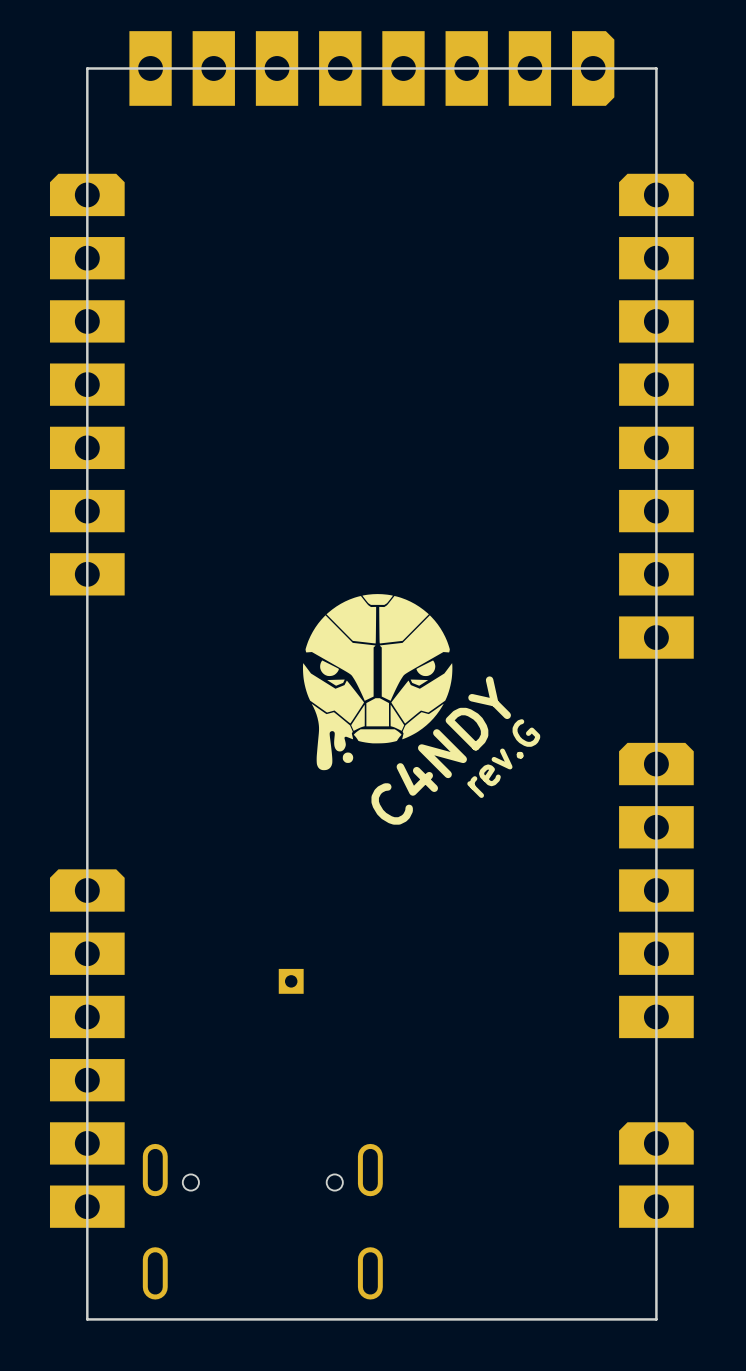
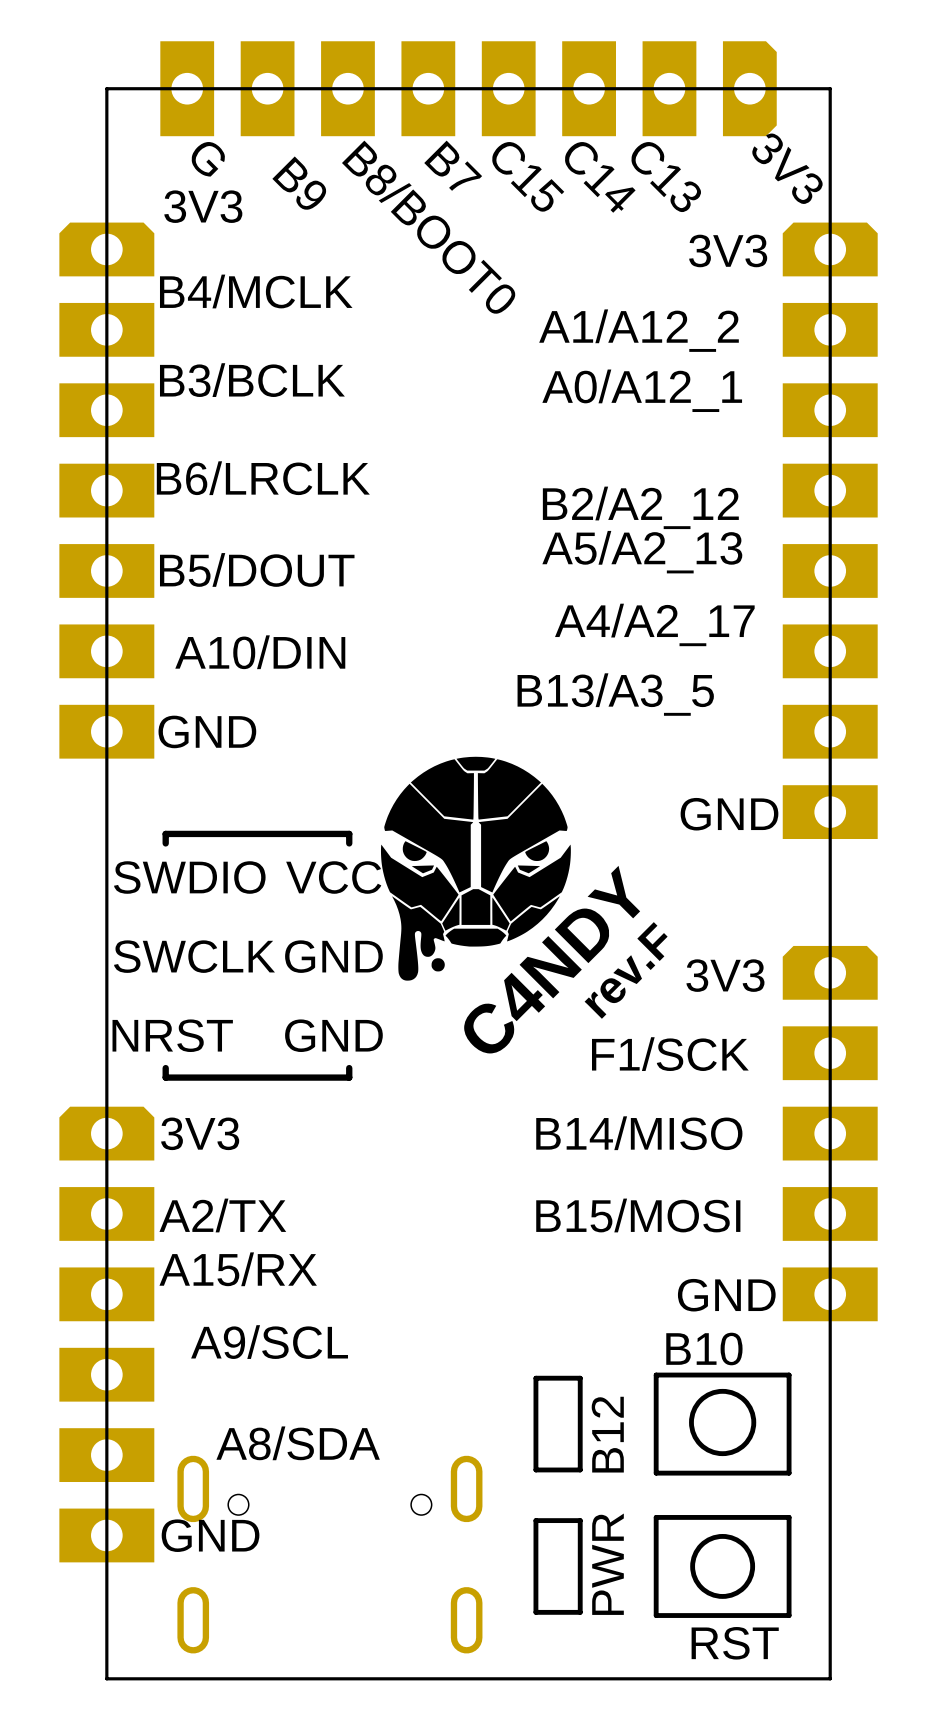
text: none -> G (208, 159)
text: none -> B7 (453, 165)
text: none -> 3V3 (787, 168)
text: none -> C15 (527, 176)
text: none -> C14 (599, 177)
text: none -> C13 (666, 177)
text: none -> B9 (299, 183)
text: none -> 3V3 (203, 206)
text: none -> B8/BOOT0 (429, 227)
text: none -> 3V3 (728, 250)
text: none -> B4/MCLK (256, 291)
text: none -> A1/A12_2 (639, 330)
text: none -> B3/BCLK (252, 380)
text: none -> A0/A12_1 (642, 390)
text: none -> B6/LRCLK (263, 478)
text: none -> B2/A2_12 (640, 507)
text: none -> A5/A2_13 (642, 552)
text: none -> B5/DOUT (257, 569)
text: none -> A4/A2_17 (654, 624)
text: none -> A10/DIN (260, 652)
text: none -> B13/A3_5 (615, 694)
text: none -> GND (207, 731)
text: none -> GND (729, 814)
line: none -> (349, 843) (349, 833) (165, 833) (165, 843)
text: none -> SWDIO (189, 877)
text: none -> VCC (333, 877)
text: none -> SWCLK (194, 956)
text: none -> GND (333, 956)
text: rev.G (503, 758) -> rev.F (626, 970)
text: none -> 3V3 (725, 975)
text: none -> NRST (172, 1035)
text: none -> GND (333, 1035)
text: none -> F1/SCK (670, 1054)
line: none -> (349, 1068) (349, 1077) (165, 1077) (165, 1068)
text: none -> 3V3 (200, 1133)
text: none -> B14/MISO (639, 1133)
text: none -> A2/TX (222, 1215)
text: none -> B15/MOSI (638, 1215)
part: (291, 981) -> none
text: none -> A15/RX (238, 1269)
text: none -> GND (726, 1295)
text: none -> A9/SCL (269, 1342)
text: none -> B10 (704, 1349)
line: none -> (789, 1375) (656, 1375) (656, 1473) (789, 1473) (789, 1375)
line: none -> (580, 1378) (580, 1469) (535, 1469) (535, 1378) (580, 1378)
drawing: none -> [689, 1388, 757, 1457]
text: none -> B12 (607, 1434)
text: none -> A8/SDA (298, 1443)
part: (656, 1175) -> none
line: none -> (789, 1517) (789, 1615) (656, 1615) (656, 1517) (789, 1517)
line: none -> (580, 1520) (535, 1520) (535, 1612) (580, 1612) (580, 1520)
drawing: none -> [690, 1534, 756, 1599]
text: none -> GND (210, 1535)
text: none -> PWR (608, 1564)
text: none -> RST (735, 1643)

